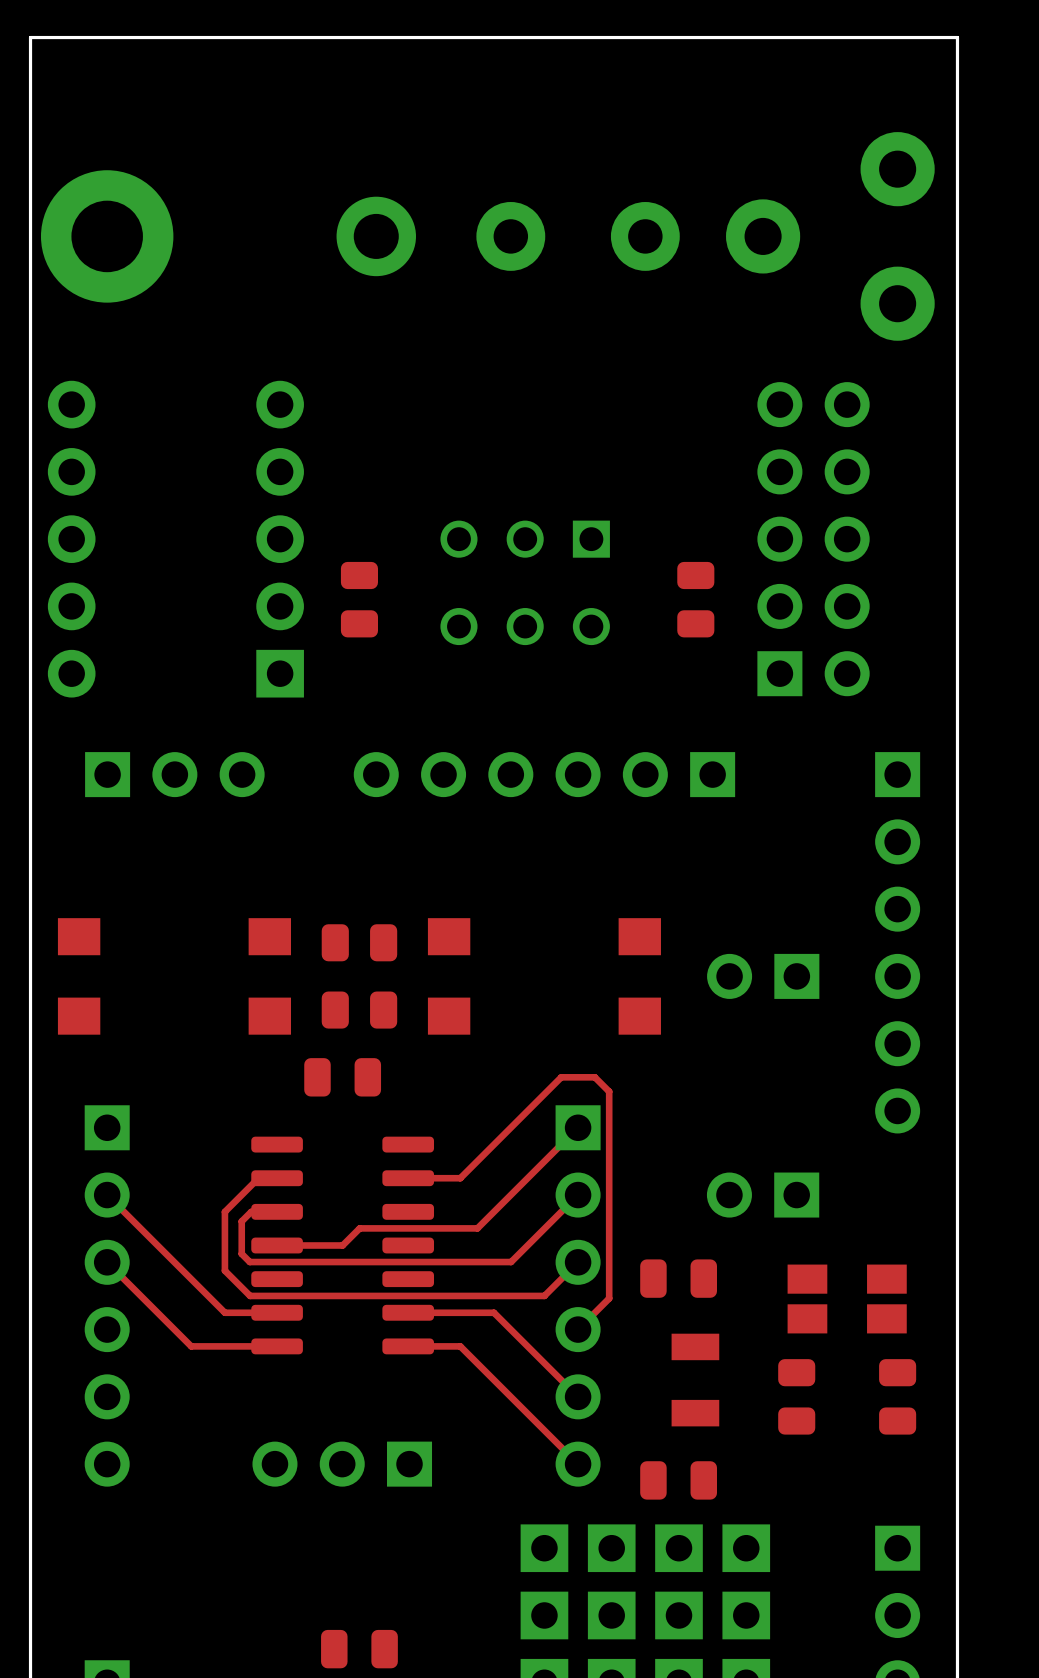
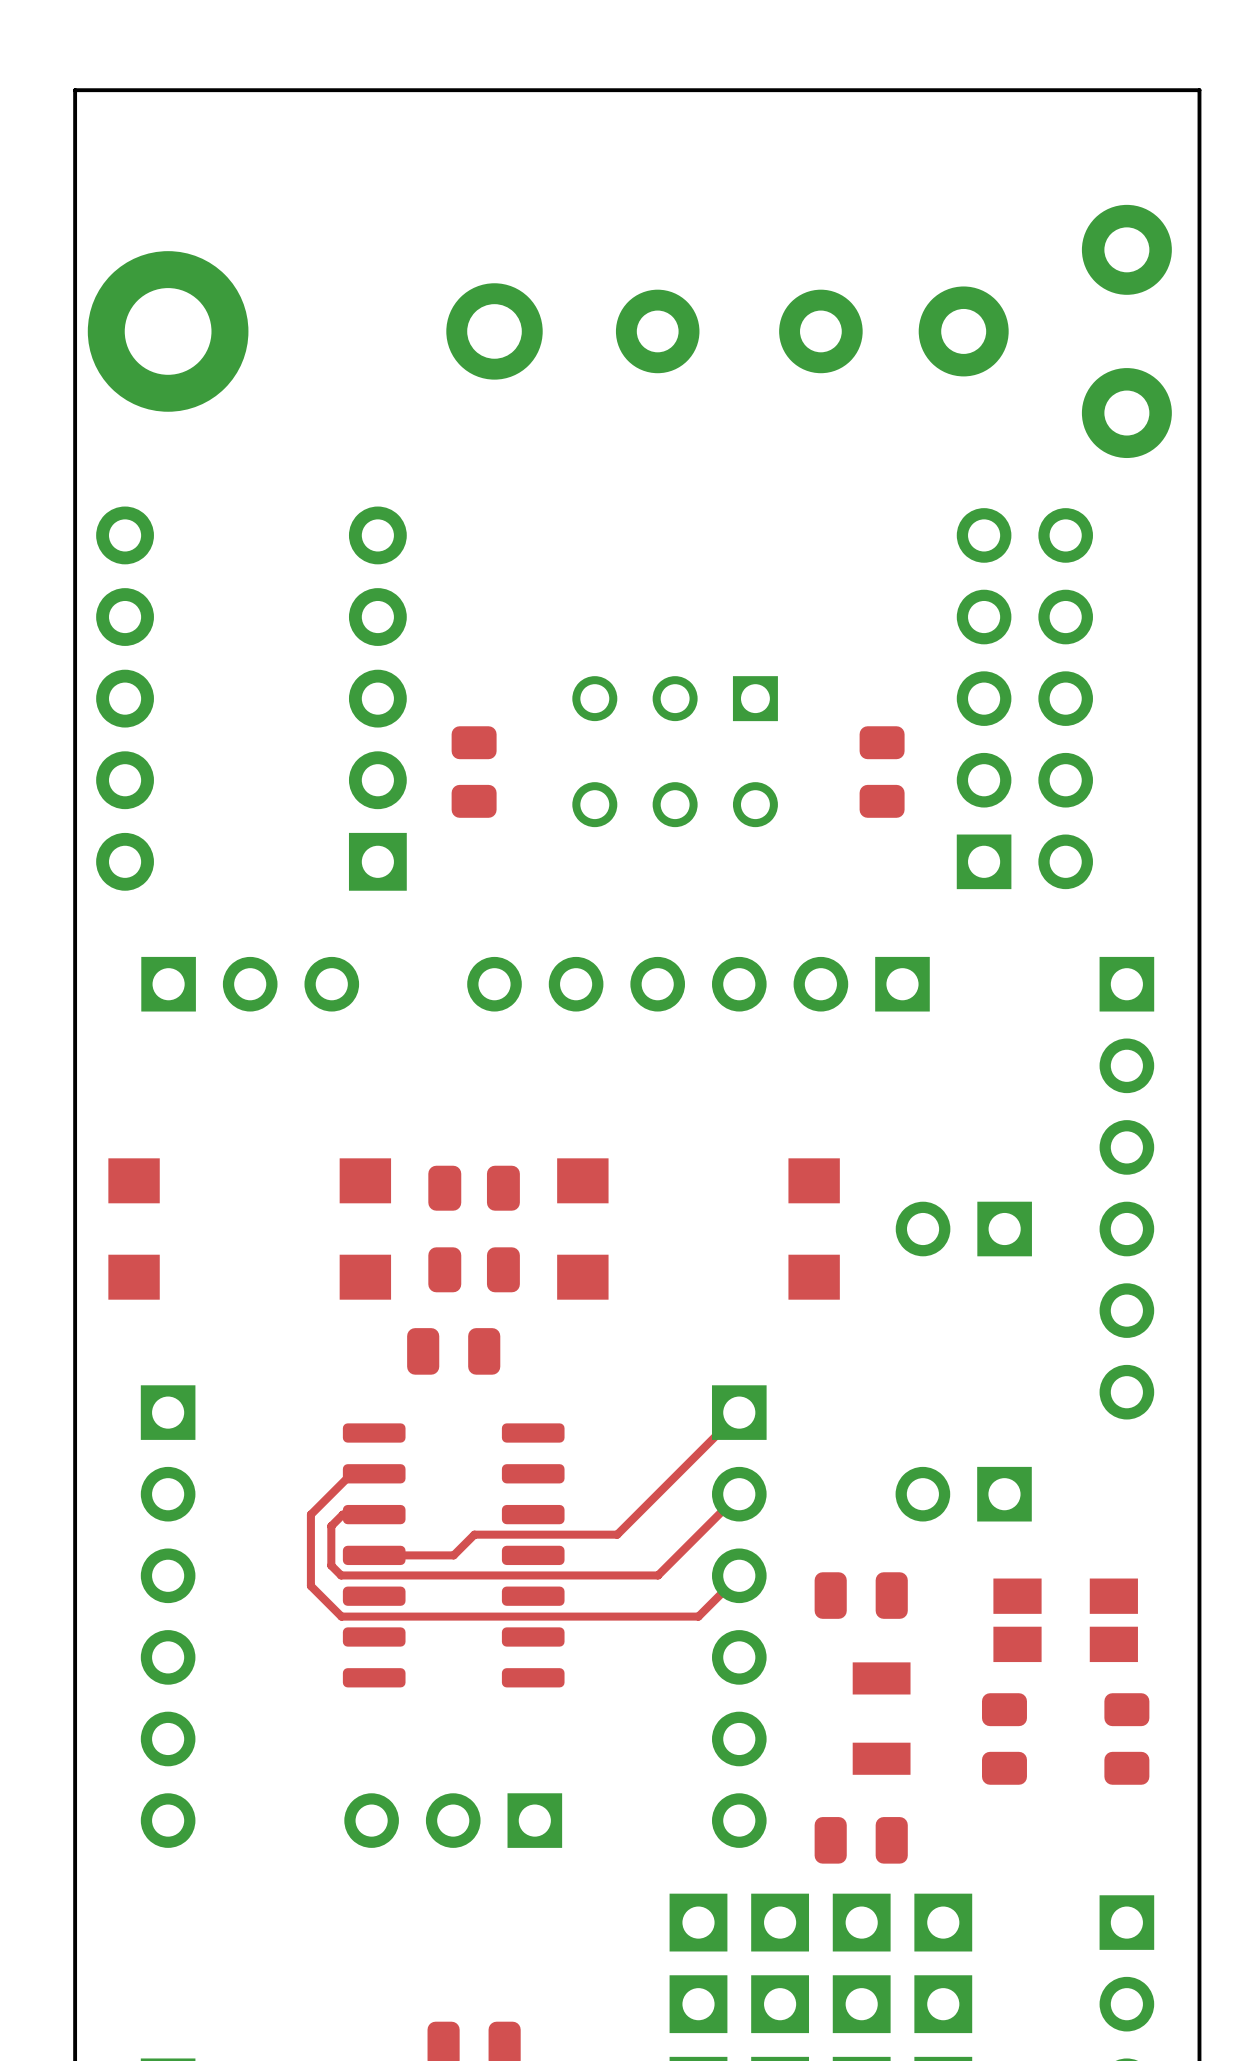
top track: (408, 1178) (460, 1178) (561, 1077) (594, 1077) (609, 1091) (609, 1298) (578, 1329) -> none
top track: (107, 1195) (224, 1312) (277, 1312) -> none
top track: (107, 1262) (191, 1346) (277, 1346) -> none
top track: (408, 1312) (494, 1312) (578, 1396) -> none
top track: (408, 1346) (460, 1346) (578, 1464) -> none

